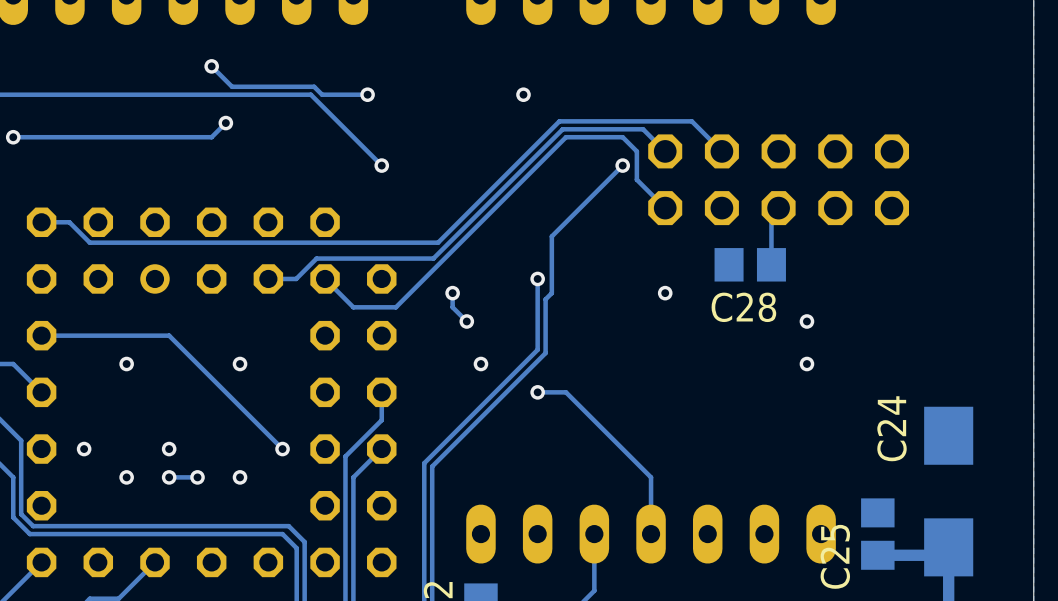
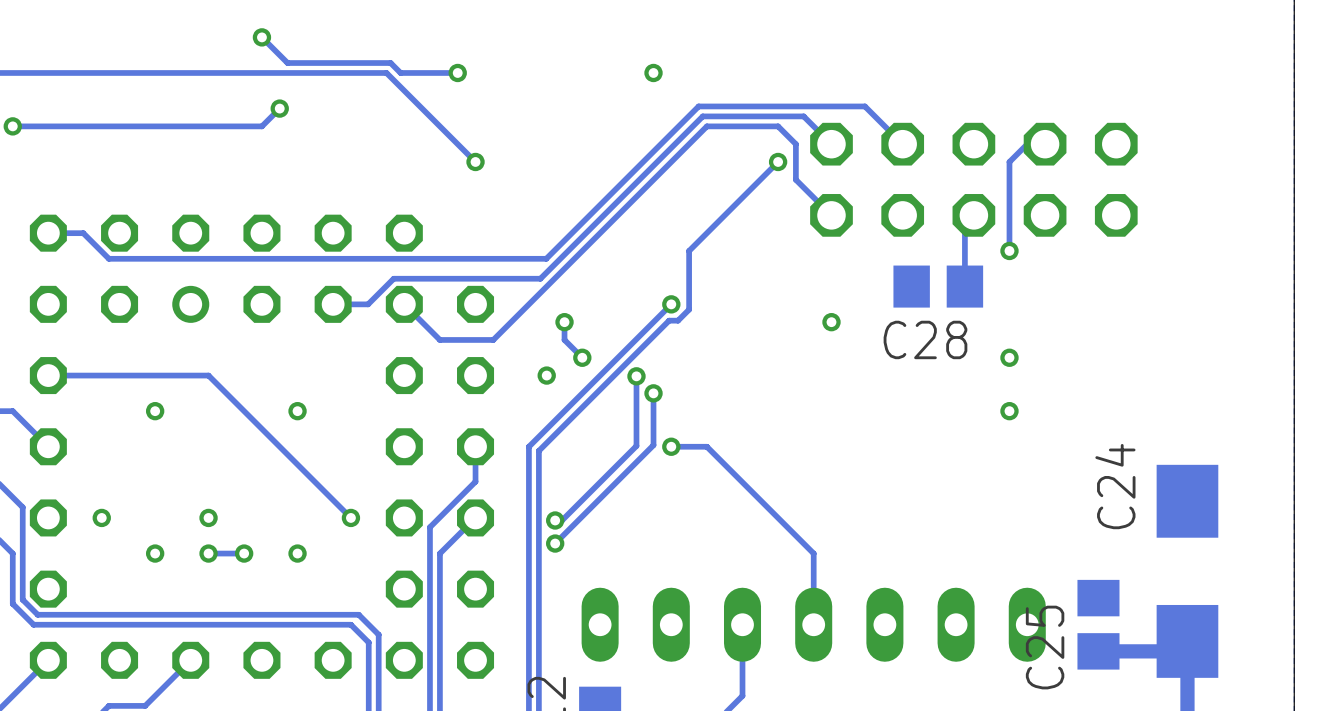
track: none -> (1045, 144) (1027, 144) (1009, 161) (1009, 250)
via: none -> (1009, 250)
track: (537, 278) (537, 349) (424, 463) -> (671, 304) (528, 446) (528, 535)
track: (551, 283) (551, 293) (545, 299) (545, 353) (432, 466) -> (689, 309) (678, 320) (669, 320) (538, 450) (538, 539)
via: none -> (546, 375)
track: none -> (636, 376) (636, 445) (561, 520) (555, 520)
via: none -> (636, 376)
track: none -> (653, 393) (653, 445) (555, 543)
via: none -> (653, 393)
via: (480, 364) -> none
via: none -> (555, 520)
via: none -> (555, 543)

